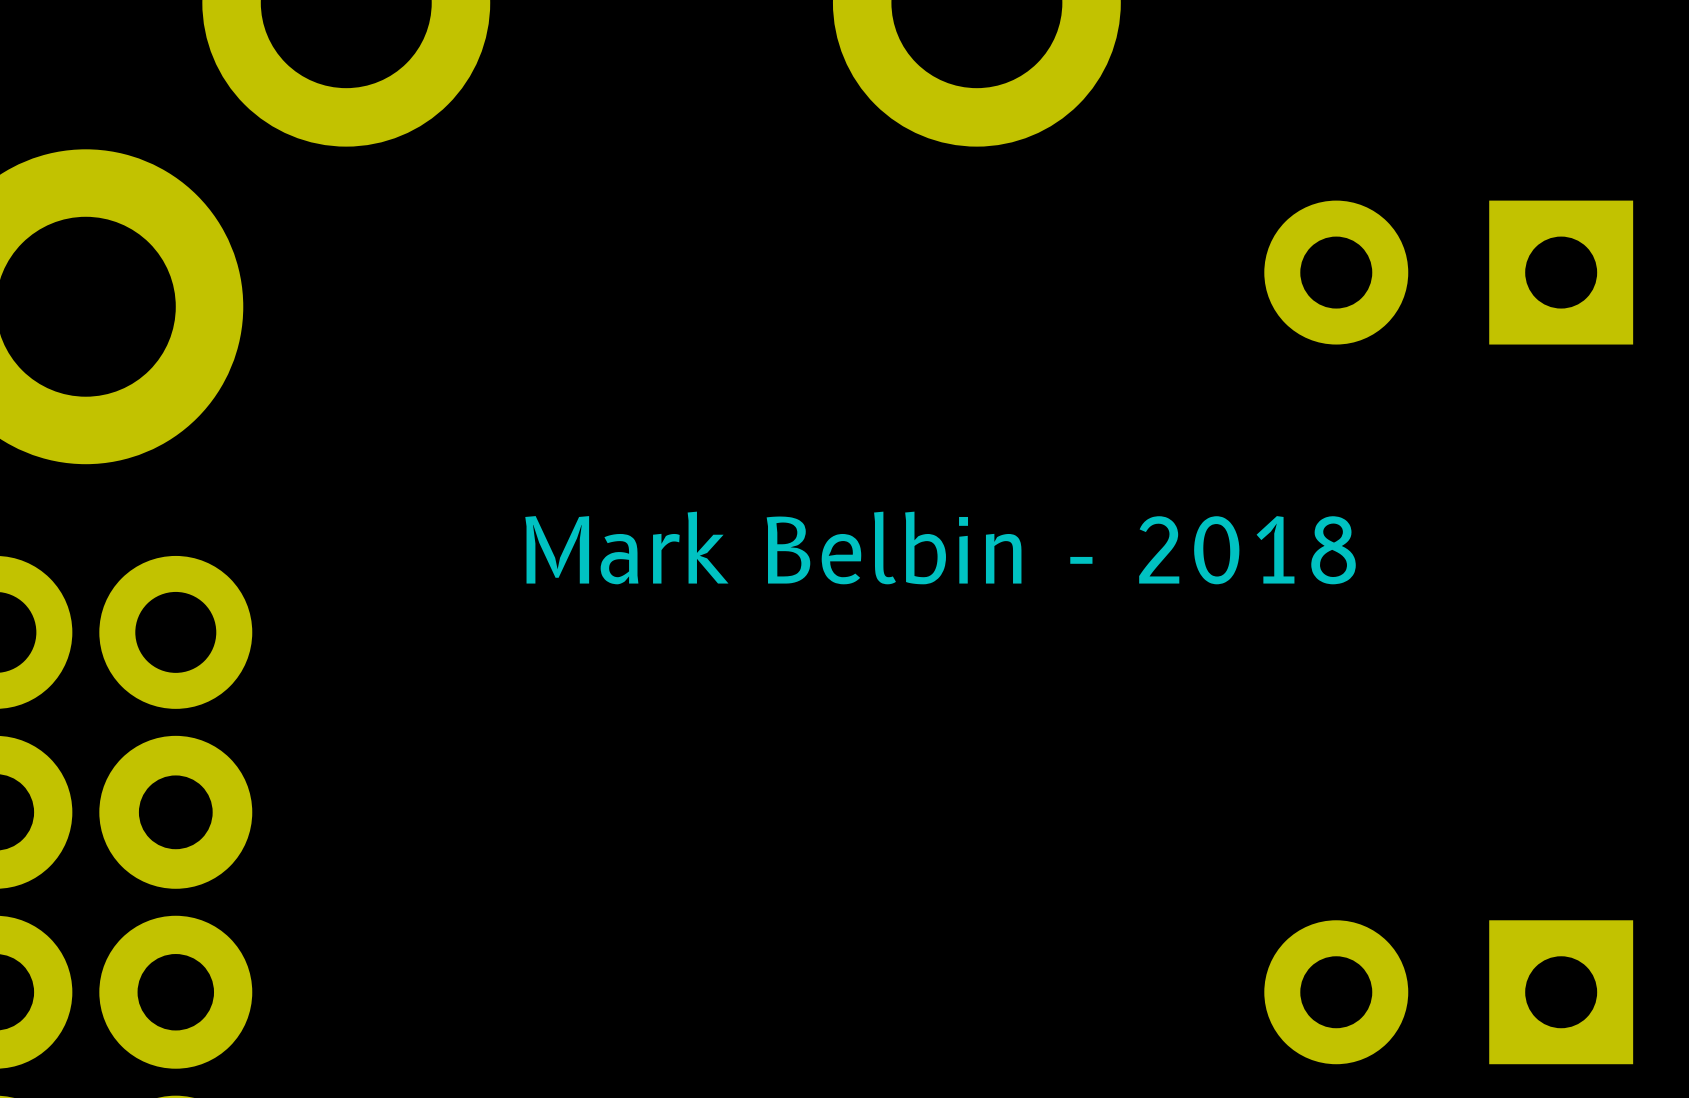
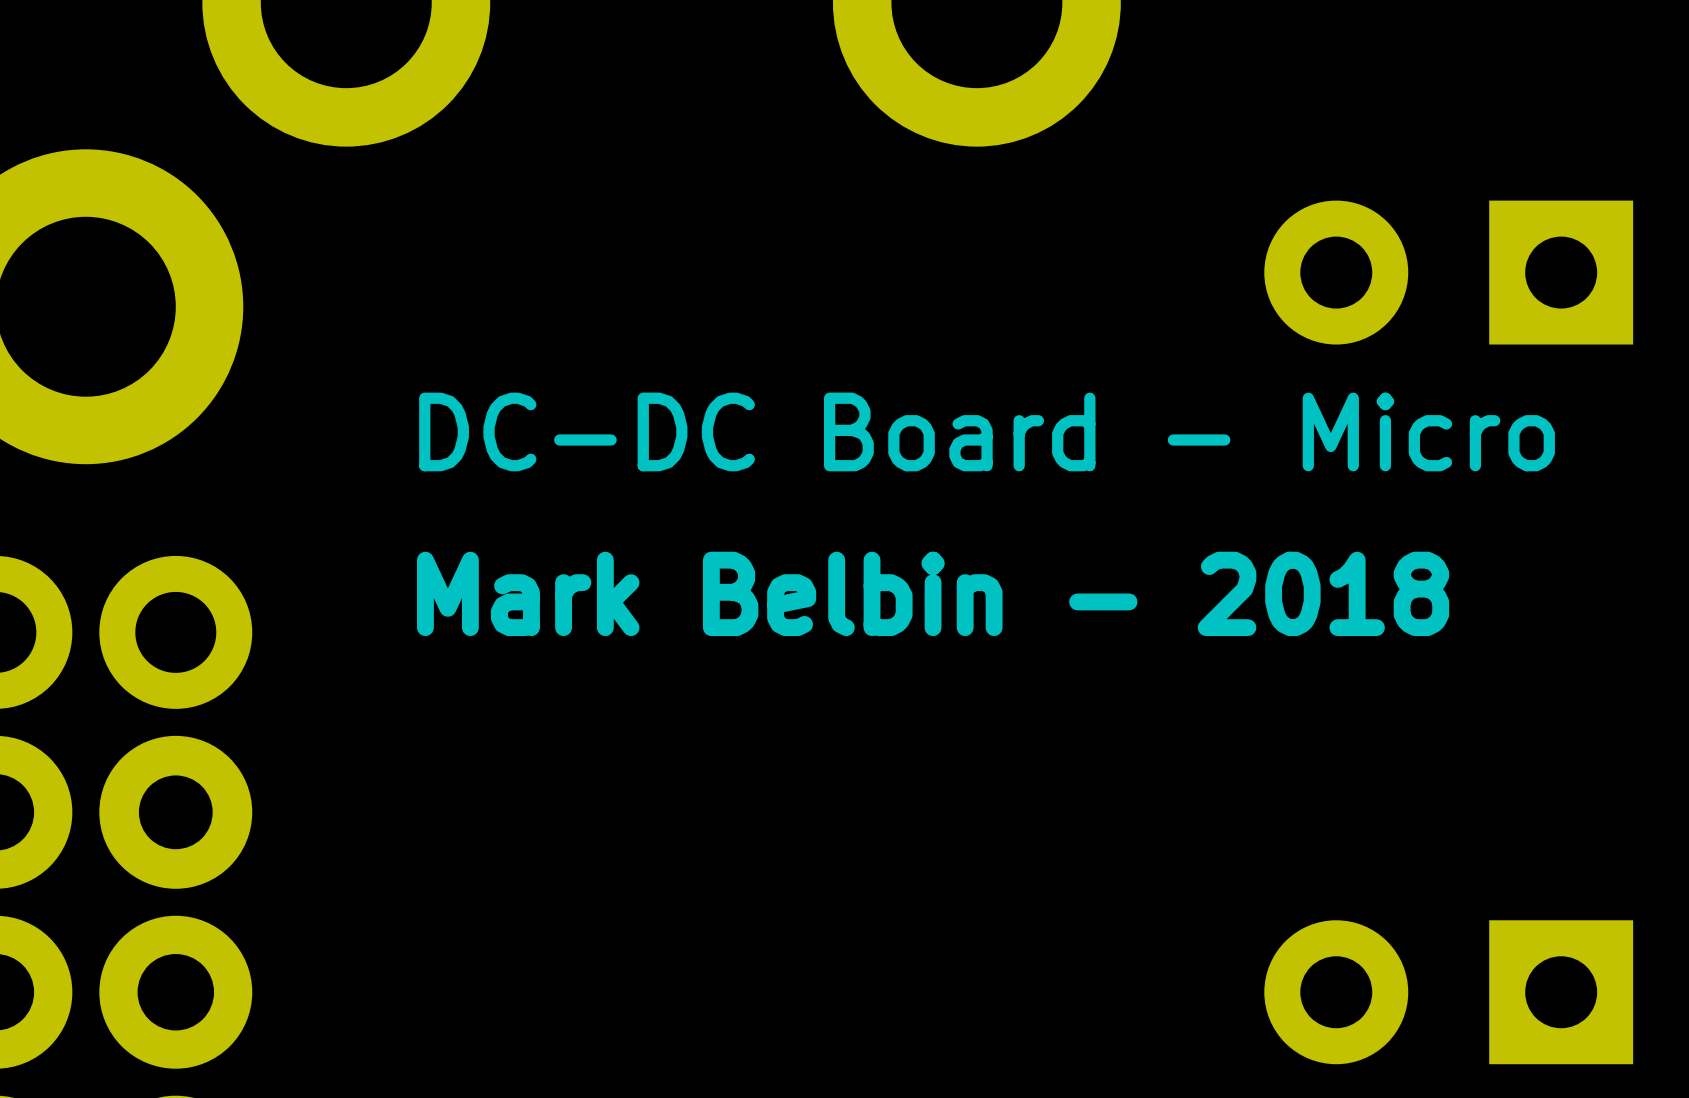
text: none -> DC-DC Board - Micro (987, 431)
text position: Mark Belbin - 2018 (940, 547) -> Mark Belbin - 2018 (933, 593)

